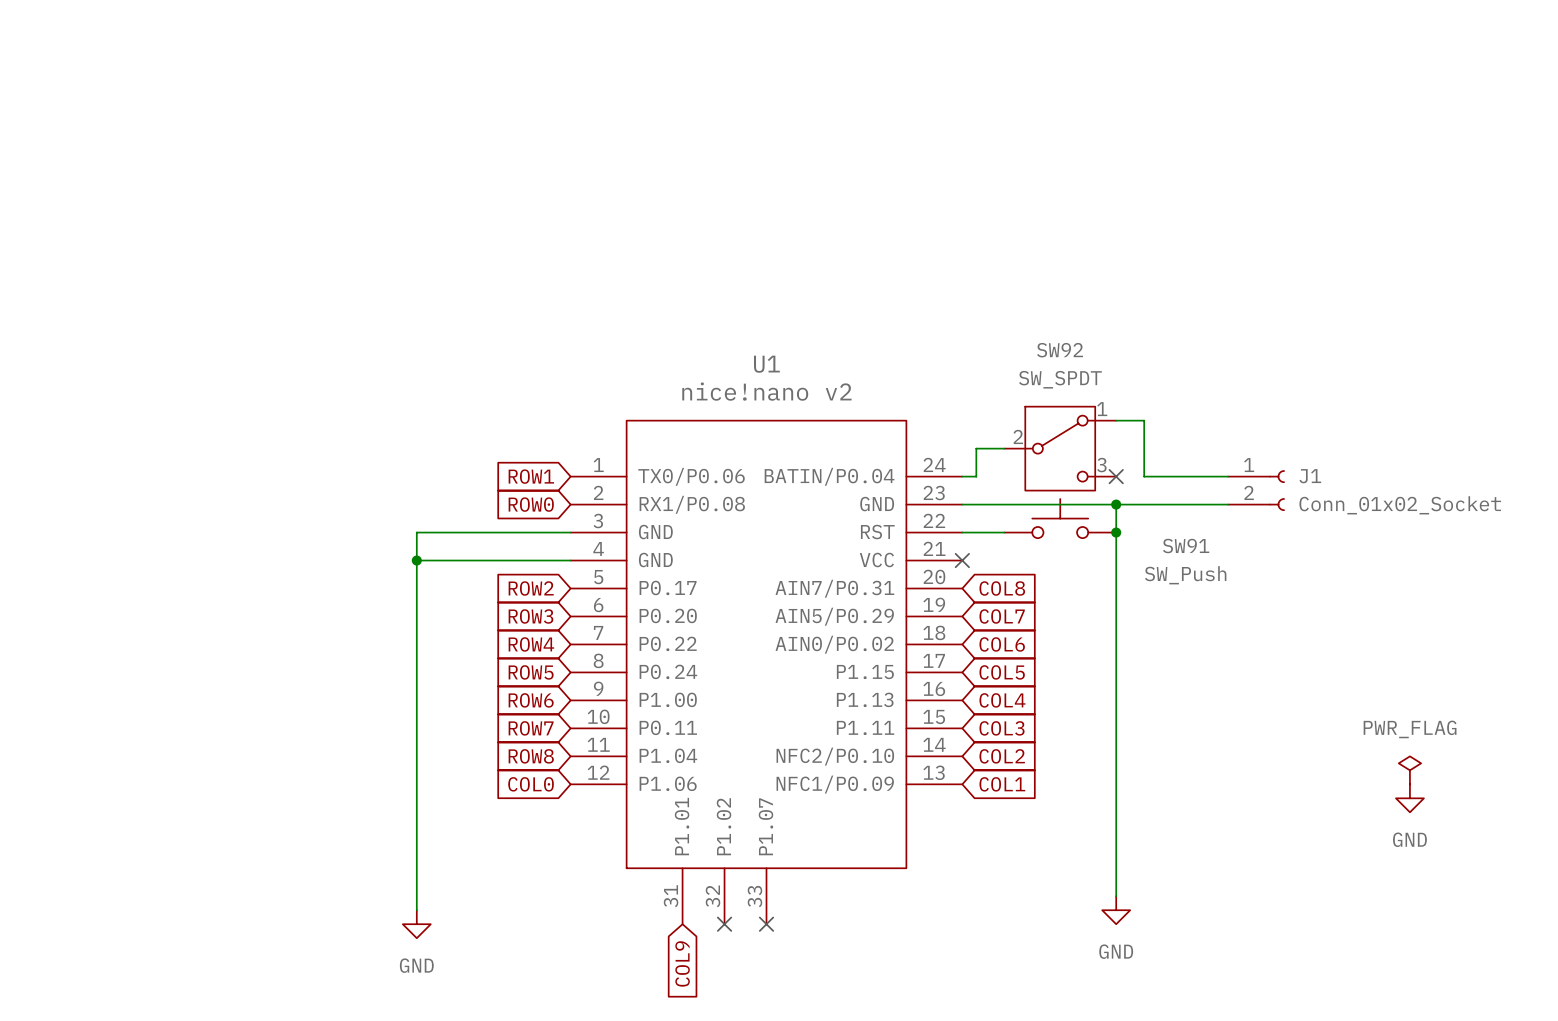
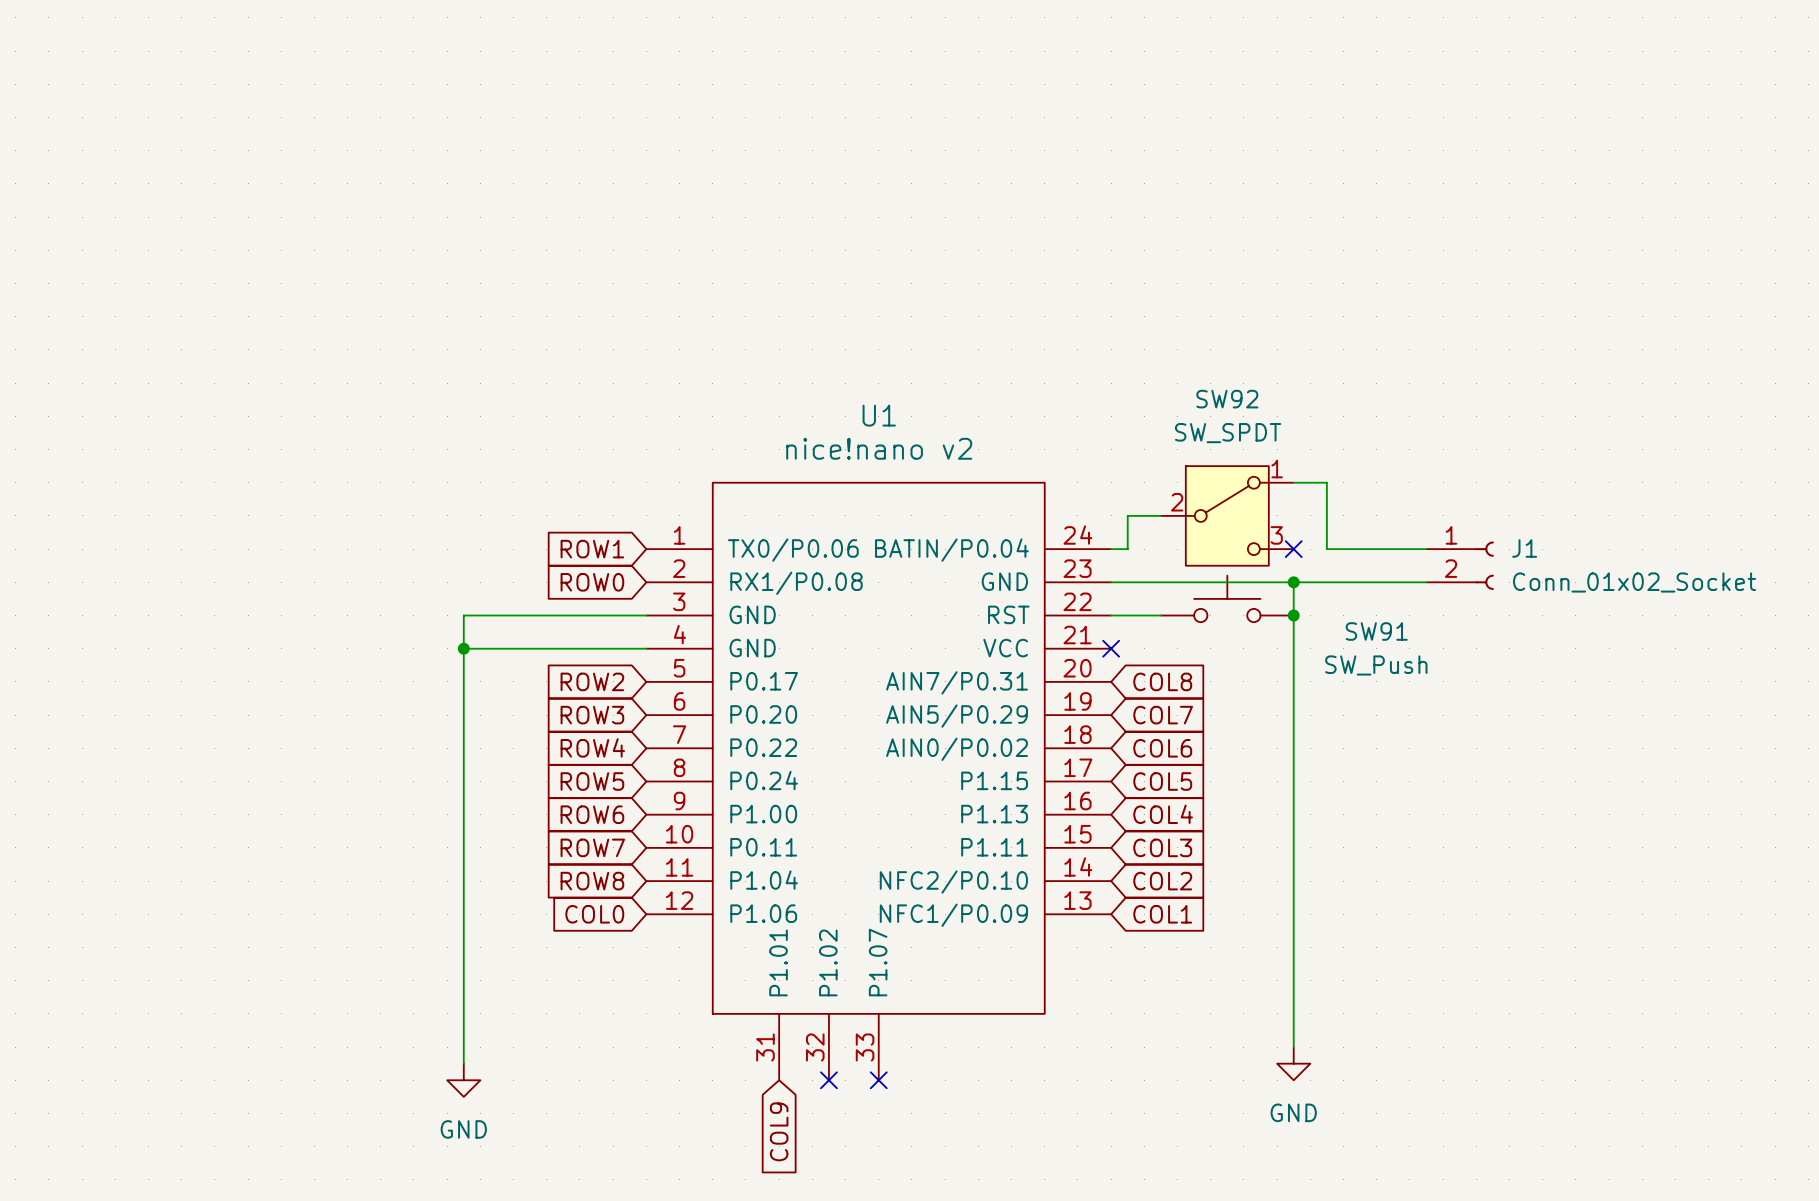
power symbol: PWR_FLAG (1409, 770) -> none
power symbol: GND (1409, 798) -> none

